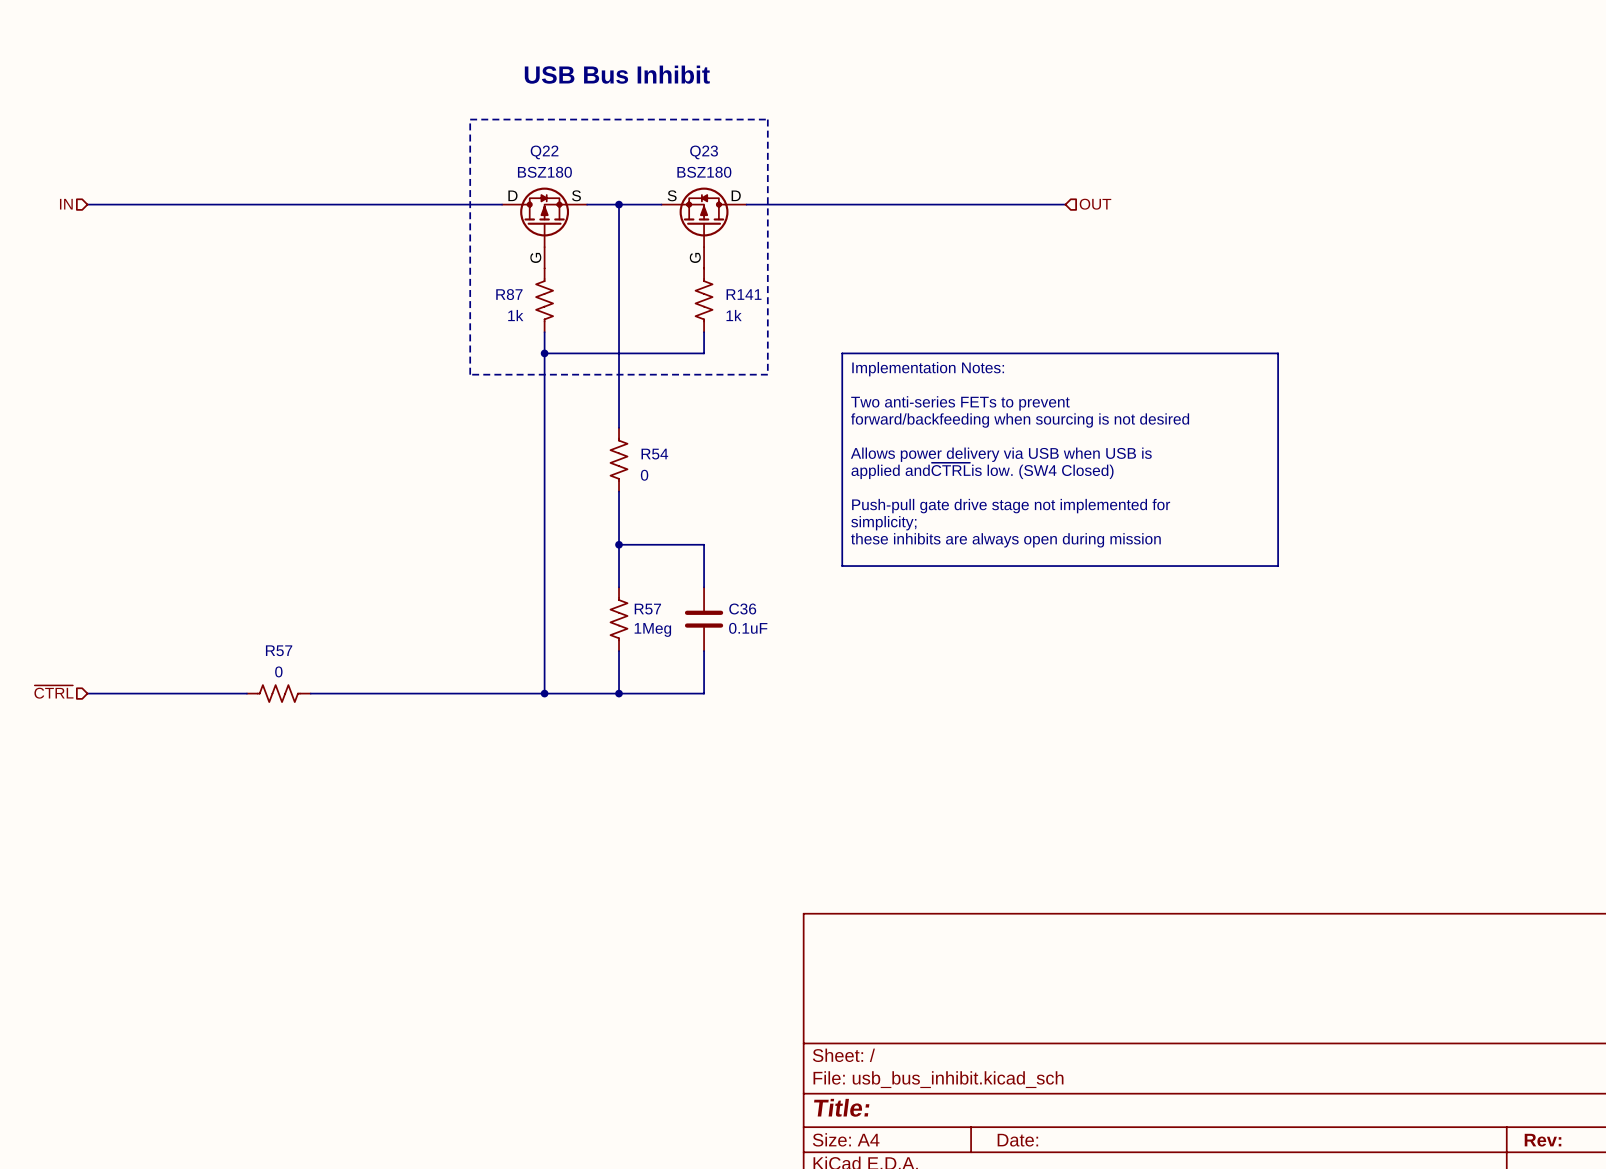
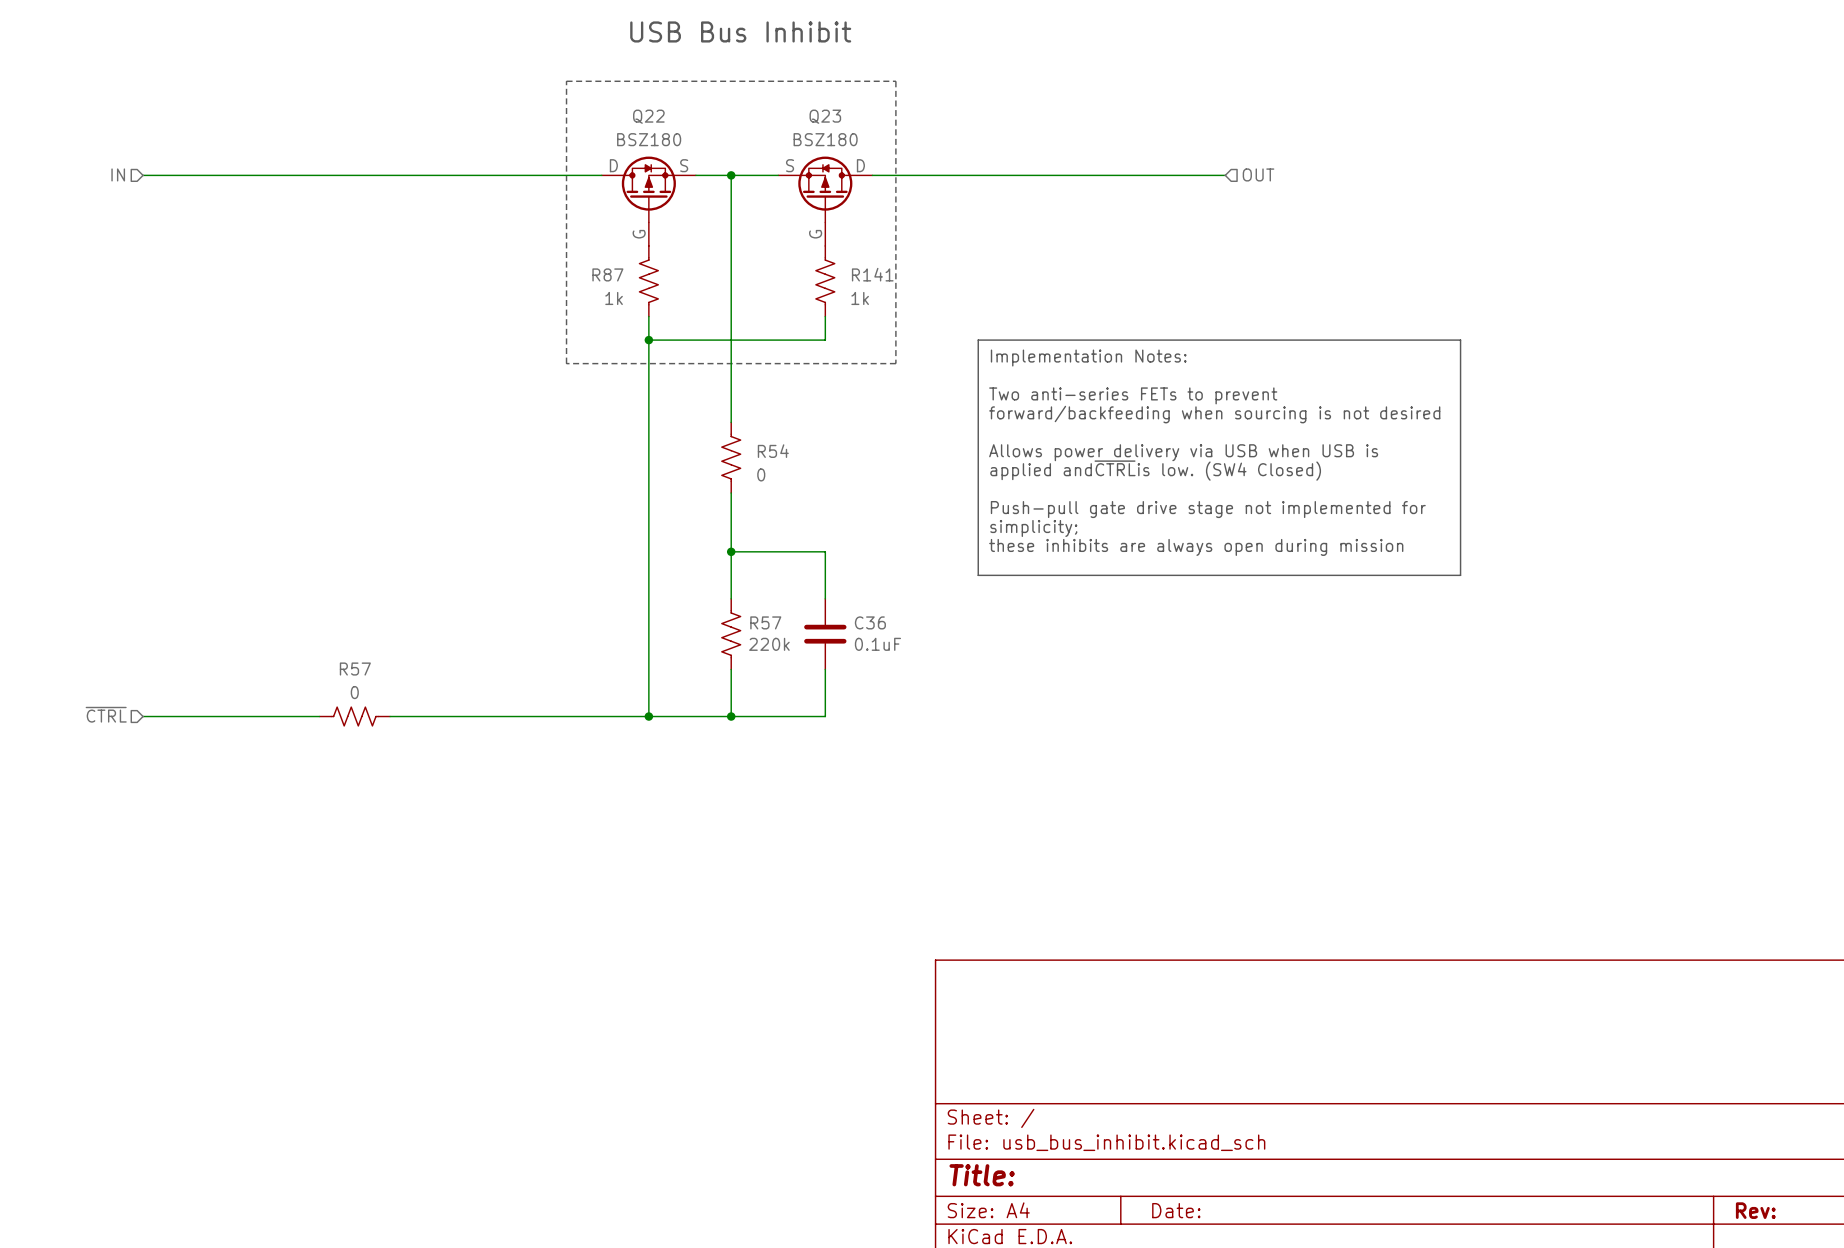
R57 value: 1Meg (652, 629) -> 220k (769, 644)

